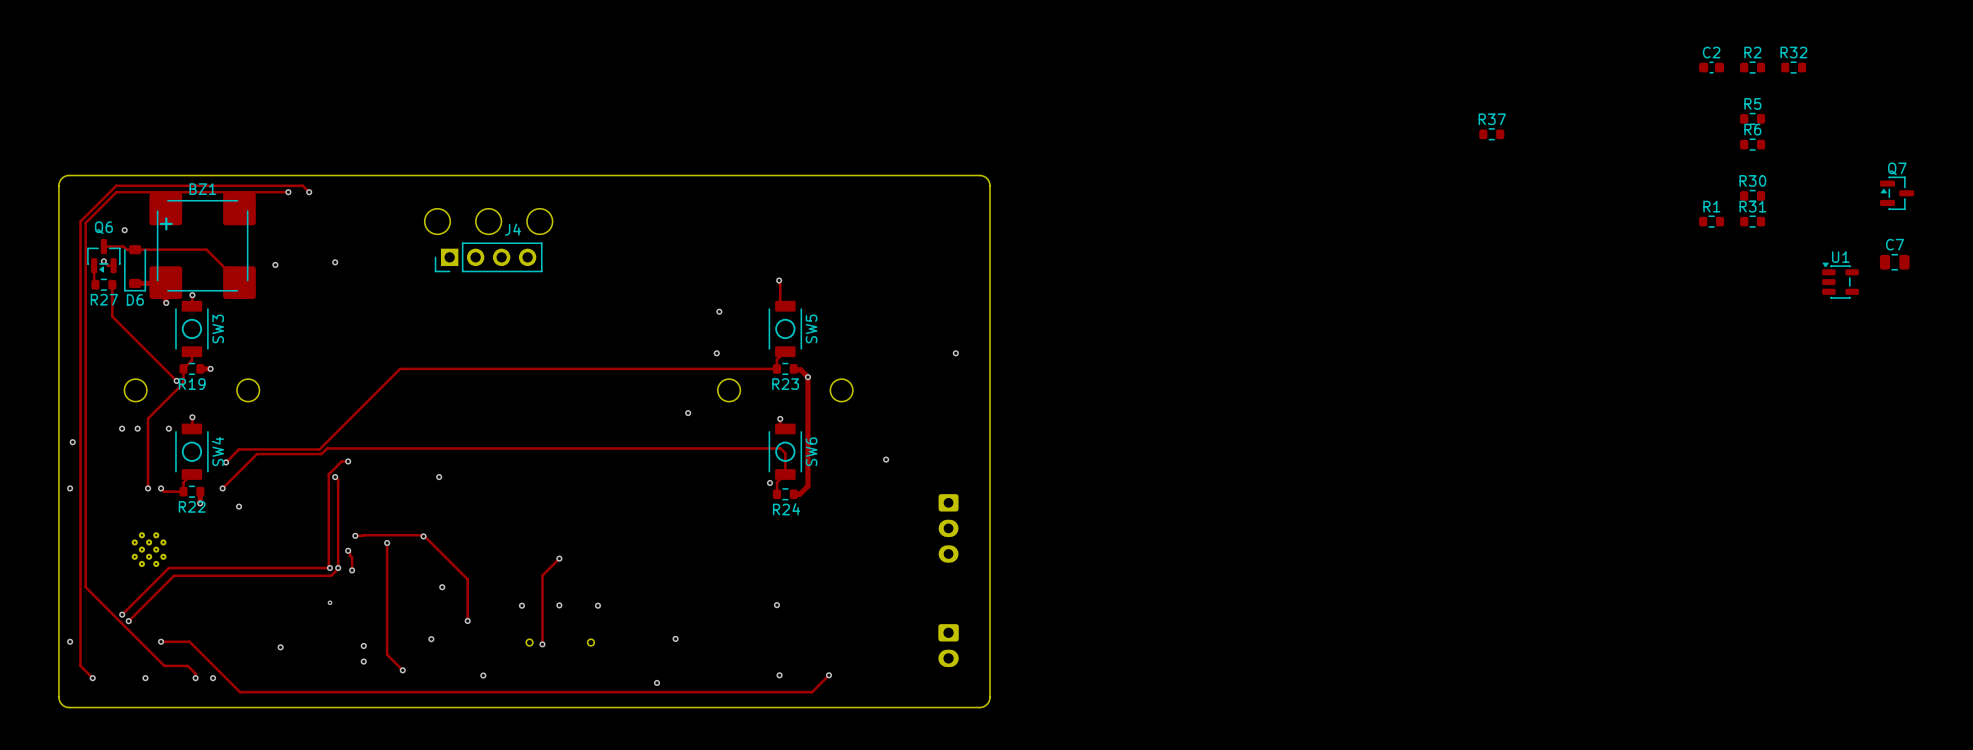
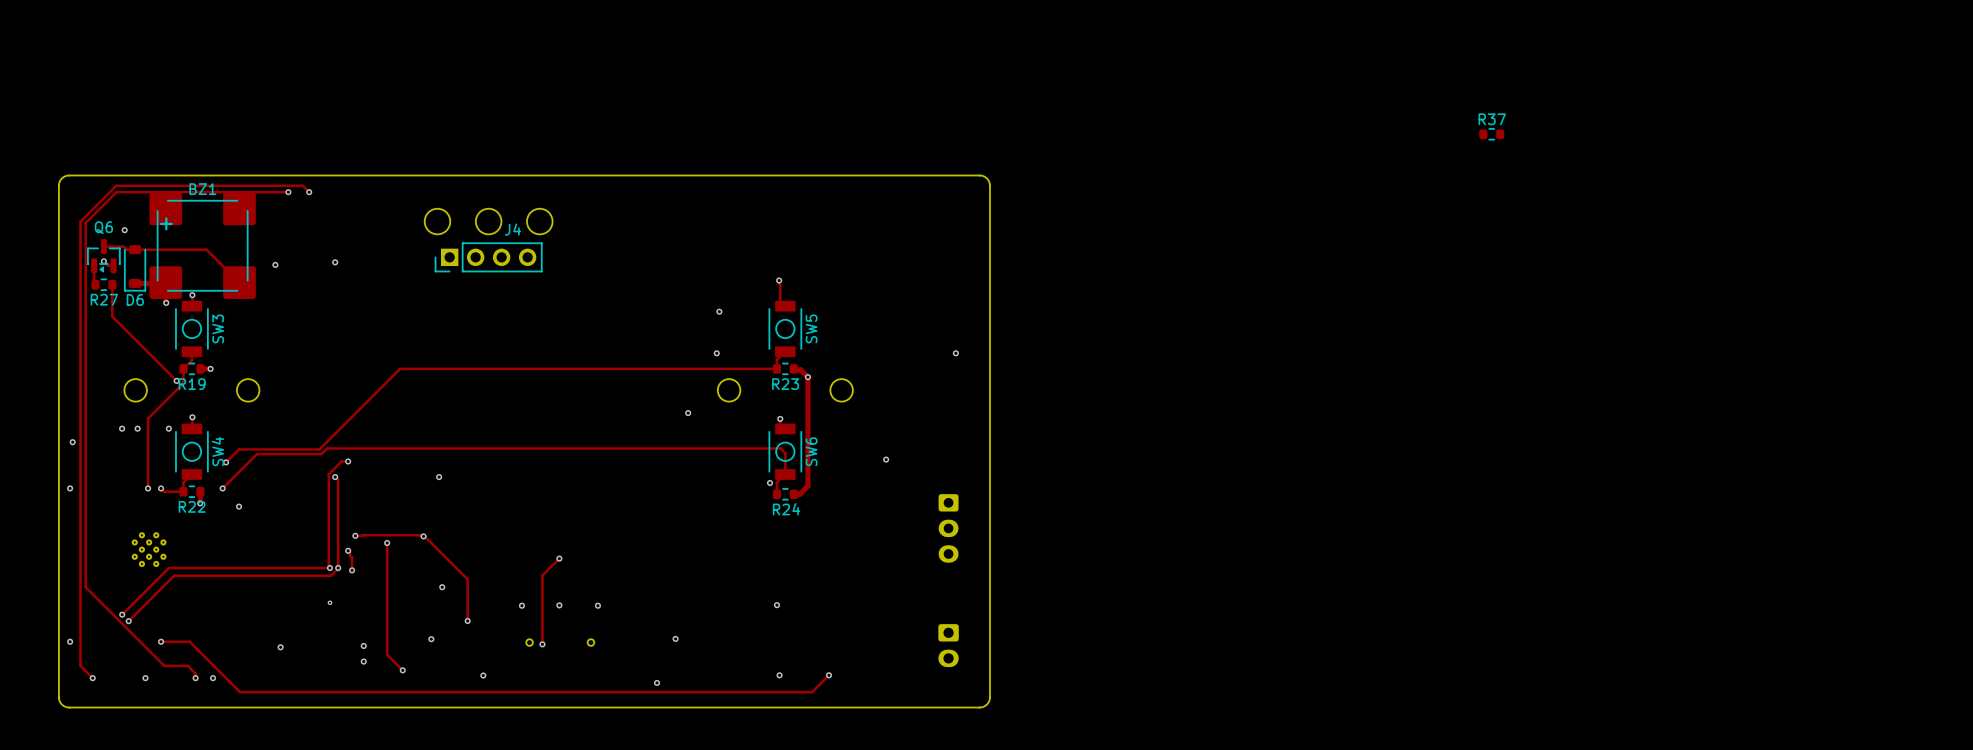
C2: (1711, 67) -> none
R2: (1752, 67) -> none
R32: (1793, 67) -> none
R5: (1752, 118) -> none
R6: (1752, 144) -> none
Q7: (1897, 193) -> none
R30: (1752, 195) -> none
R1: (1711, 221) -> none
R31: (1752, 221) -> none
C7: (1894, 262) -> none
U1: (1840, 280) -> none

